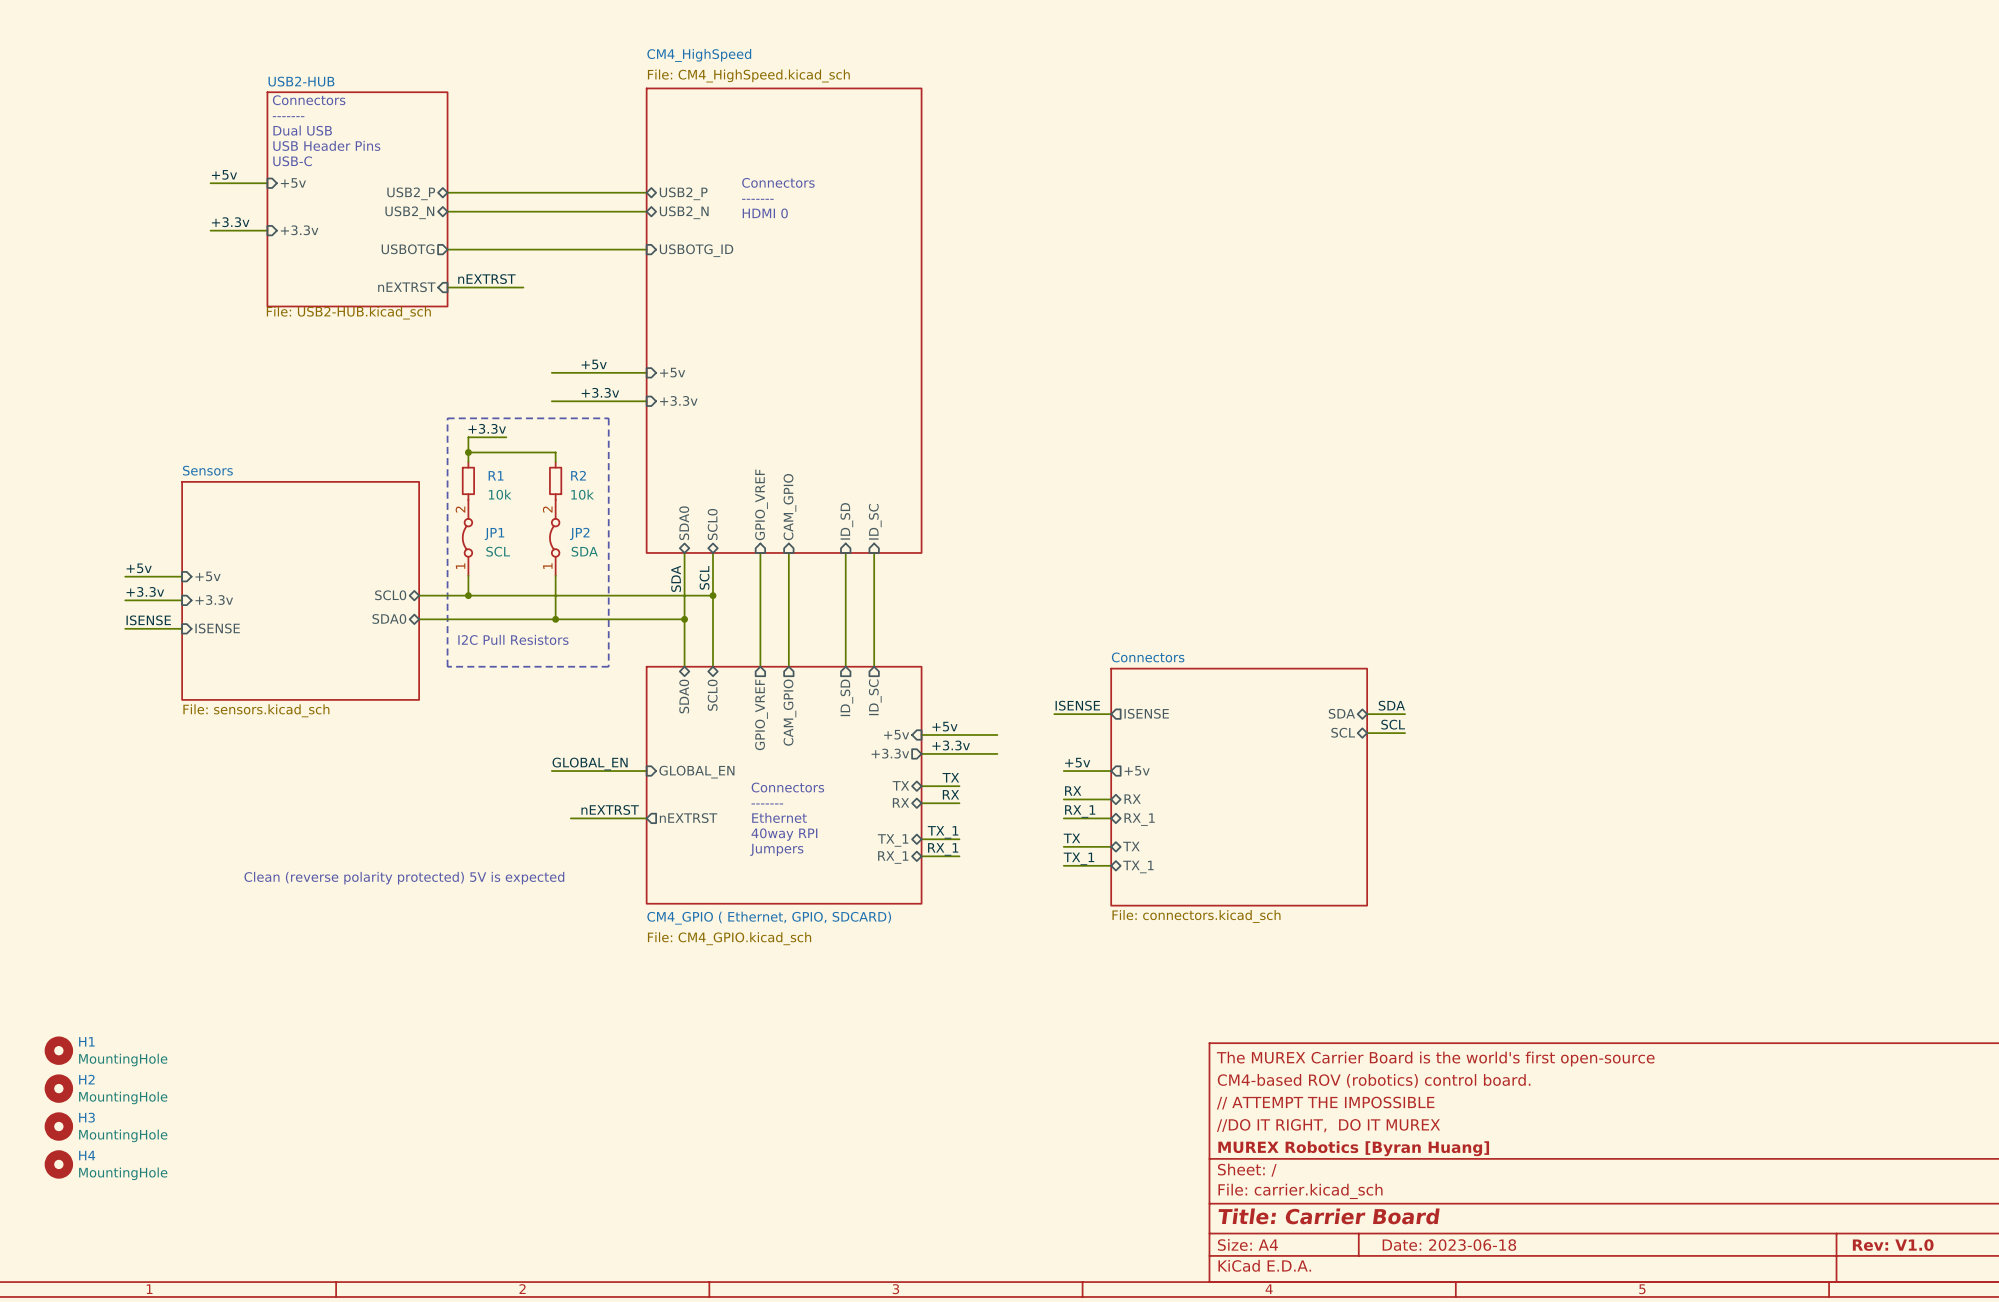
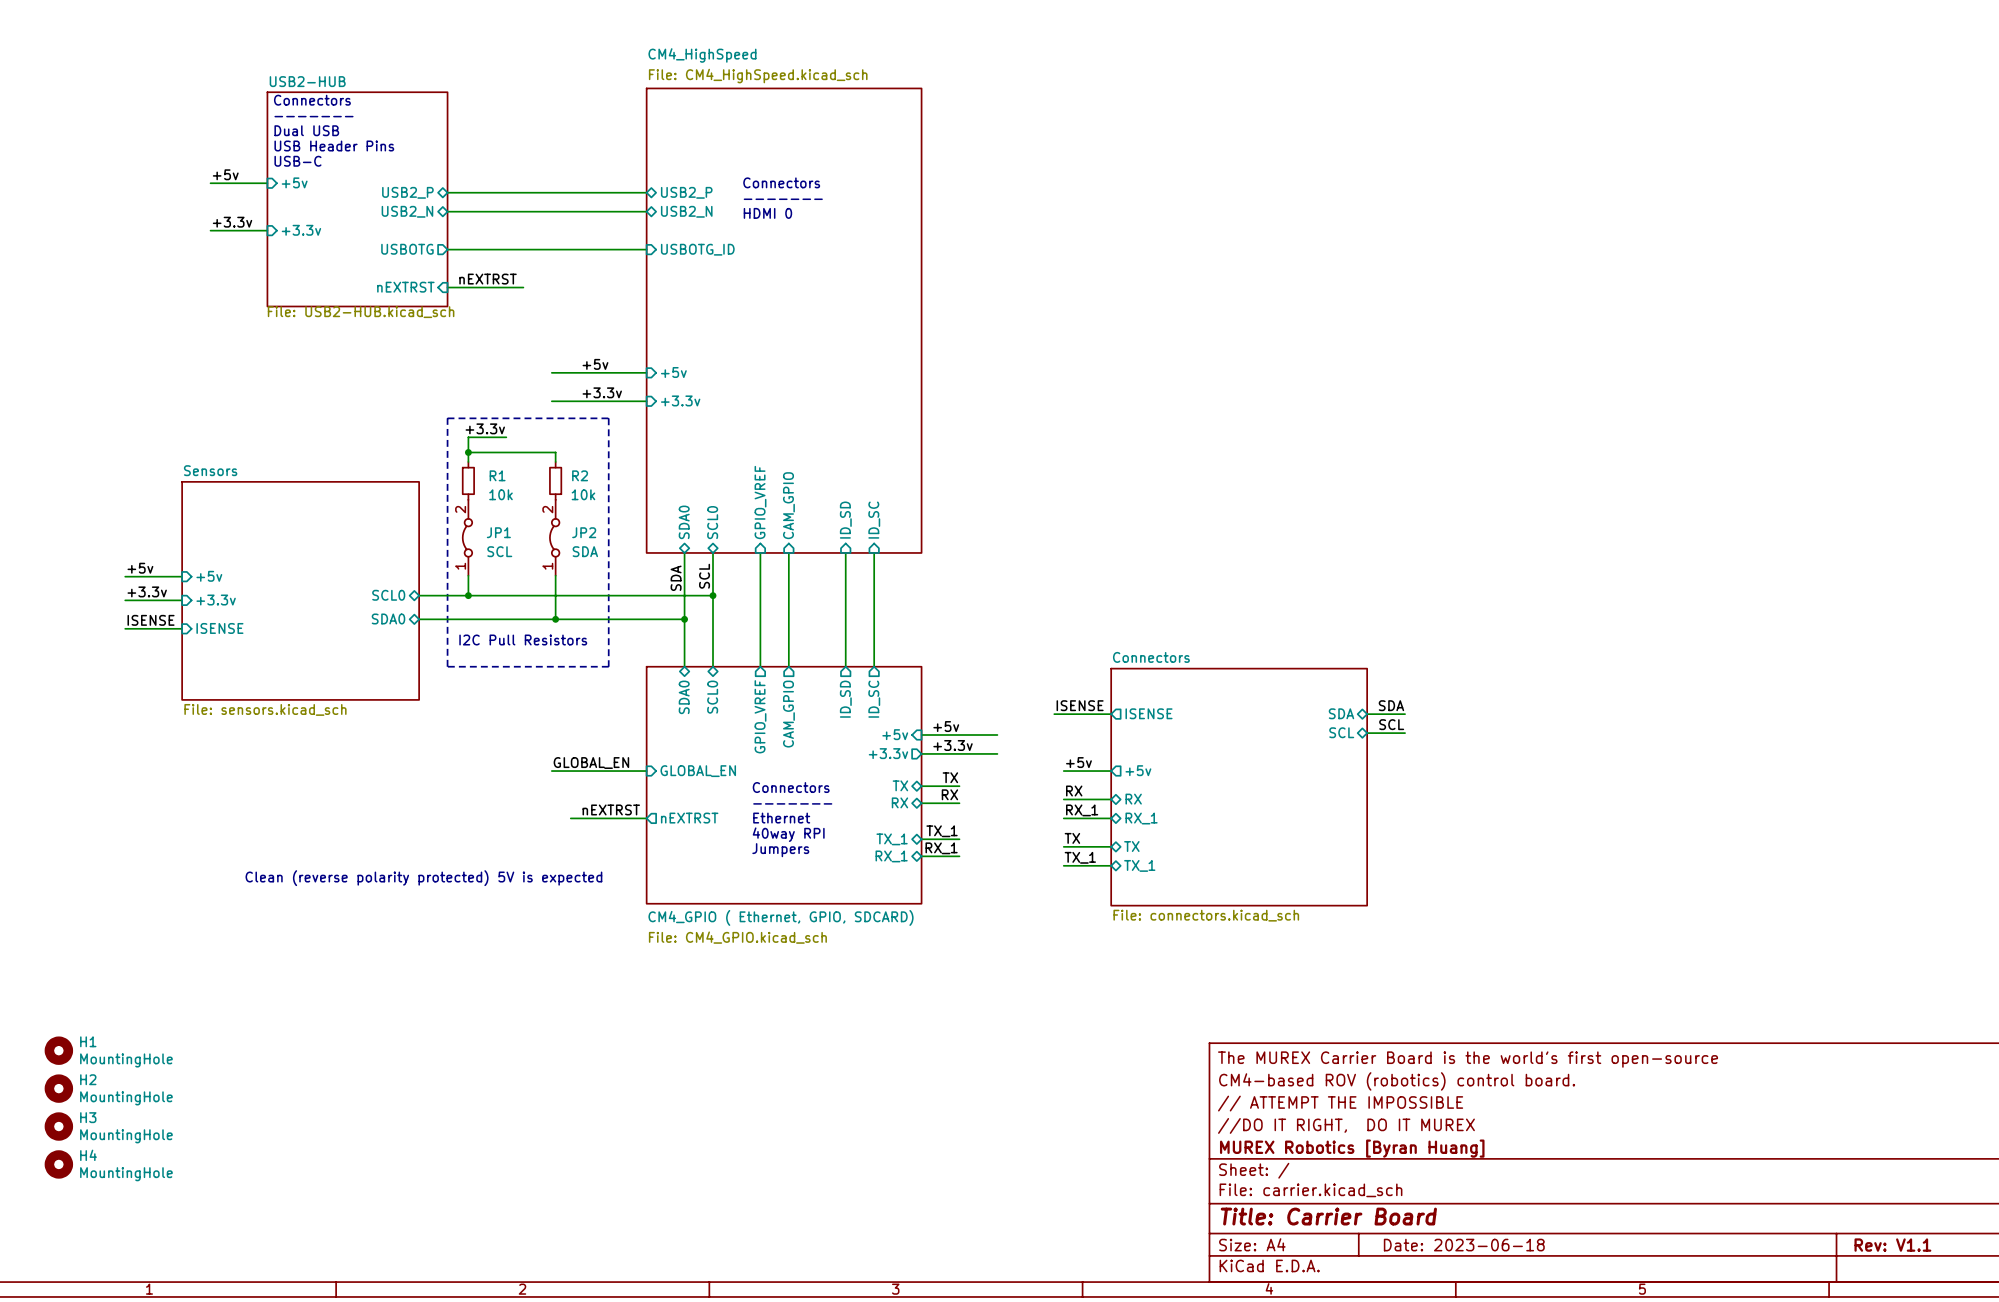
title block: Rev: V1.0 (1893, 1245) -> Rev: V1.1 (1892, 1245)

